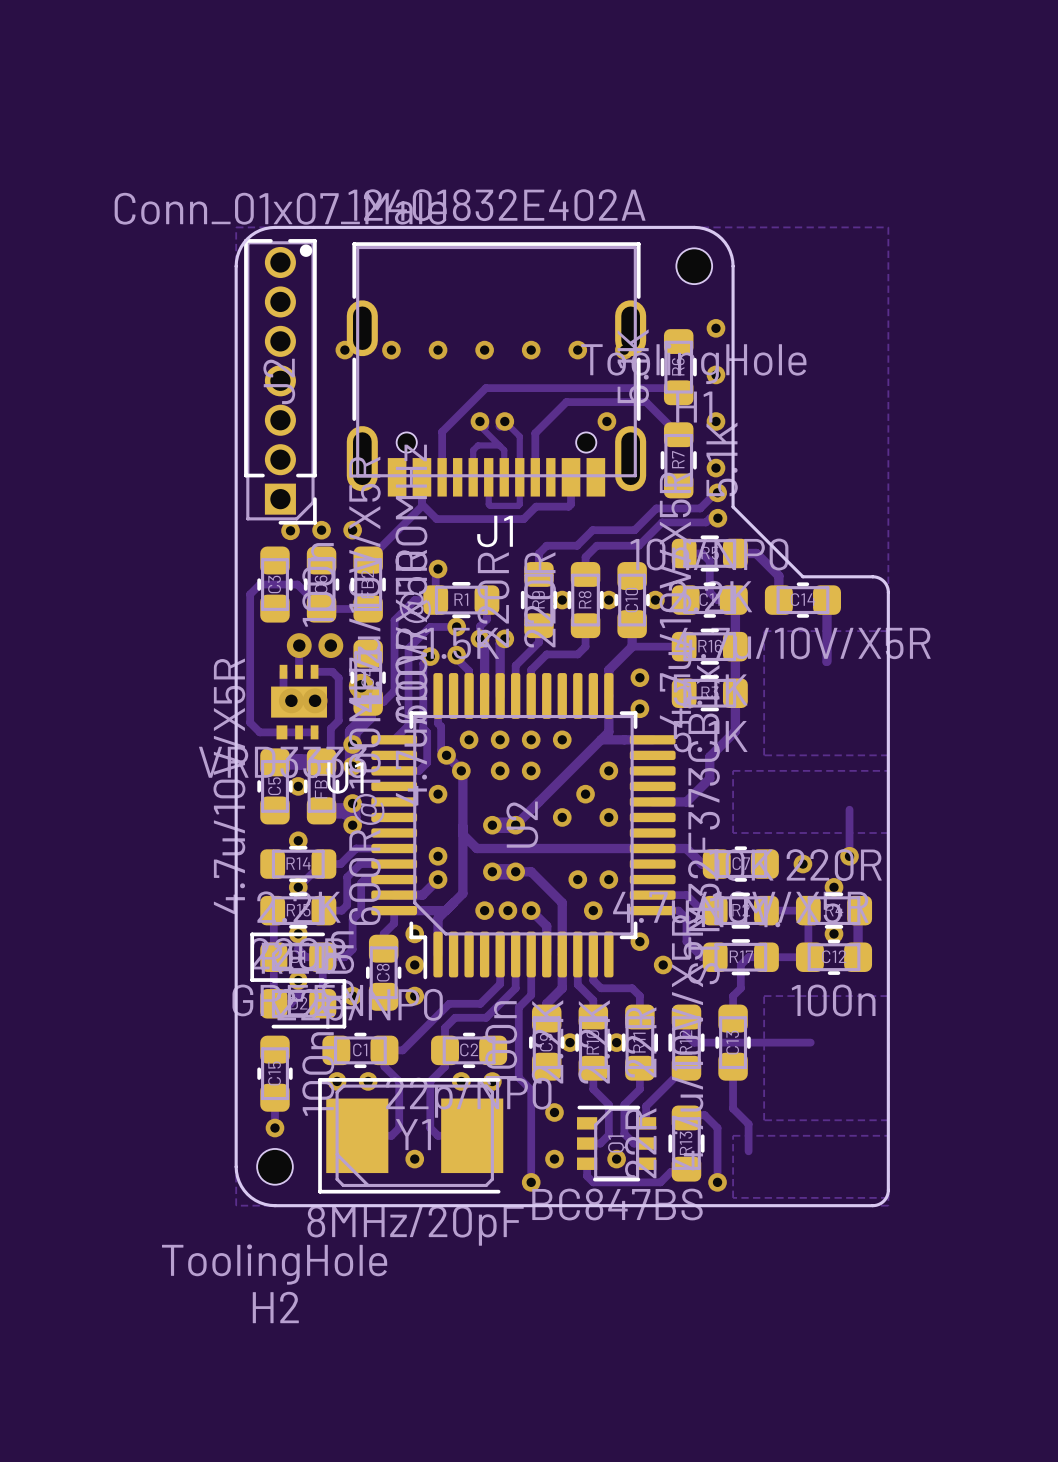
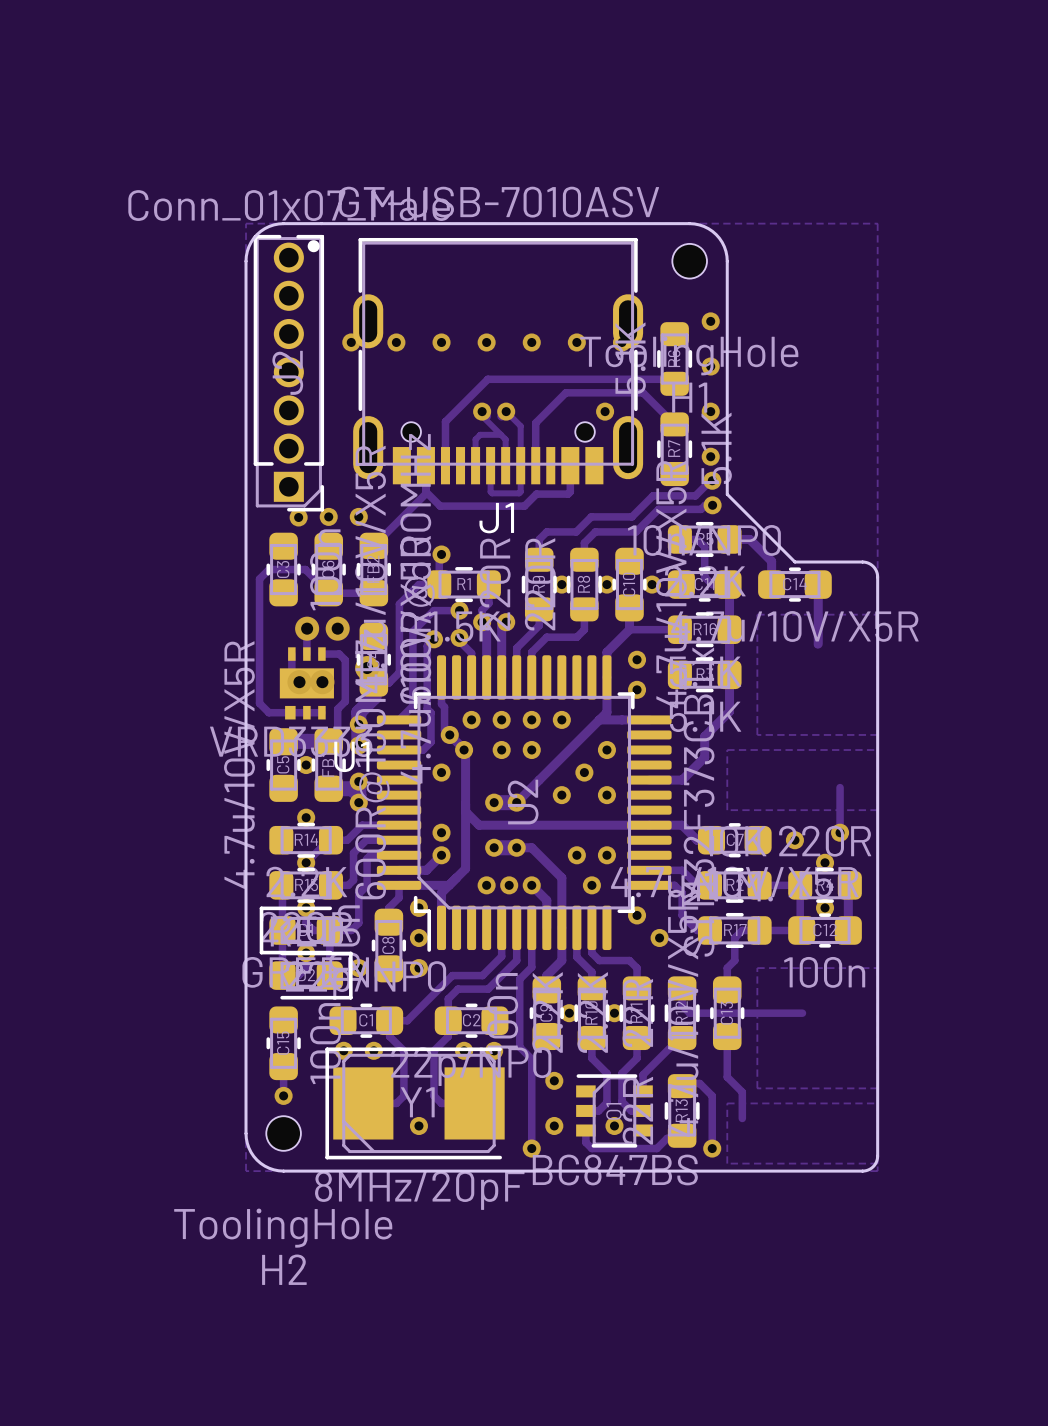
J1 value: 12401832E402A (496, 205) -> GT-USB-7010ASV (498, 202)

